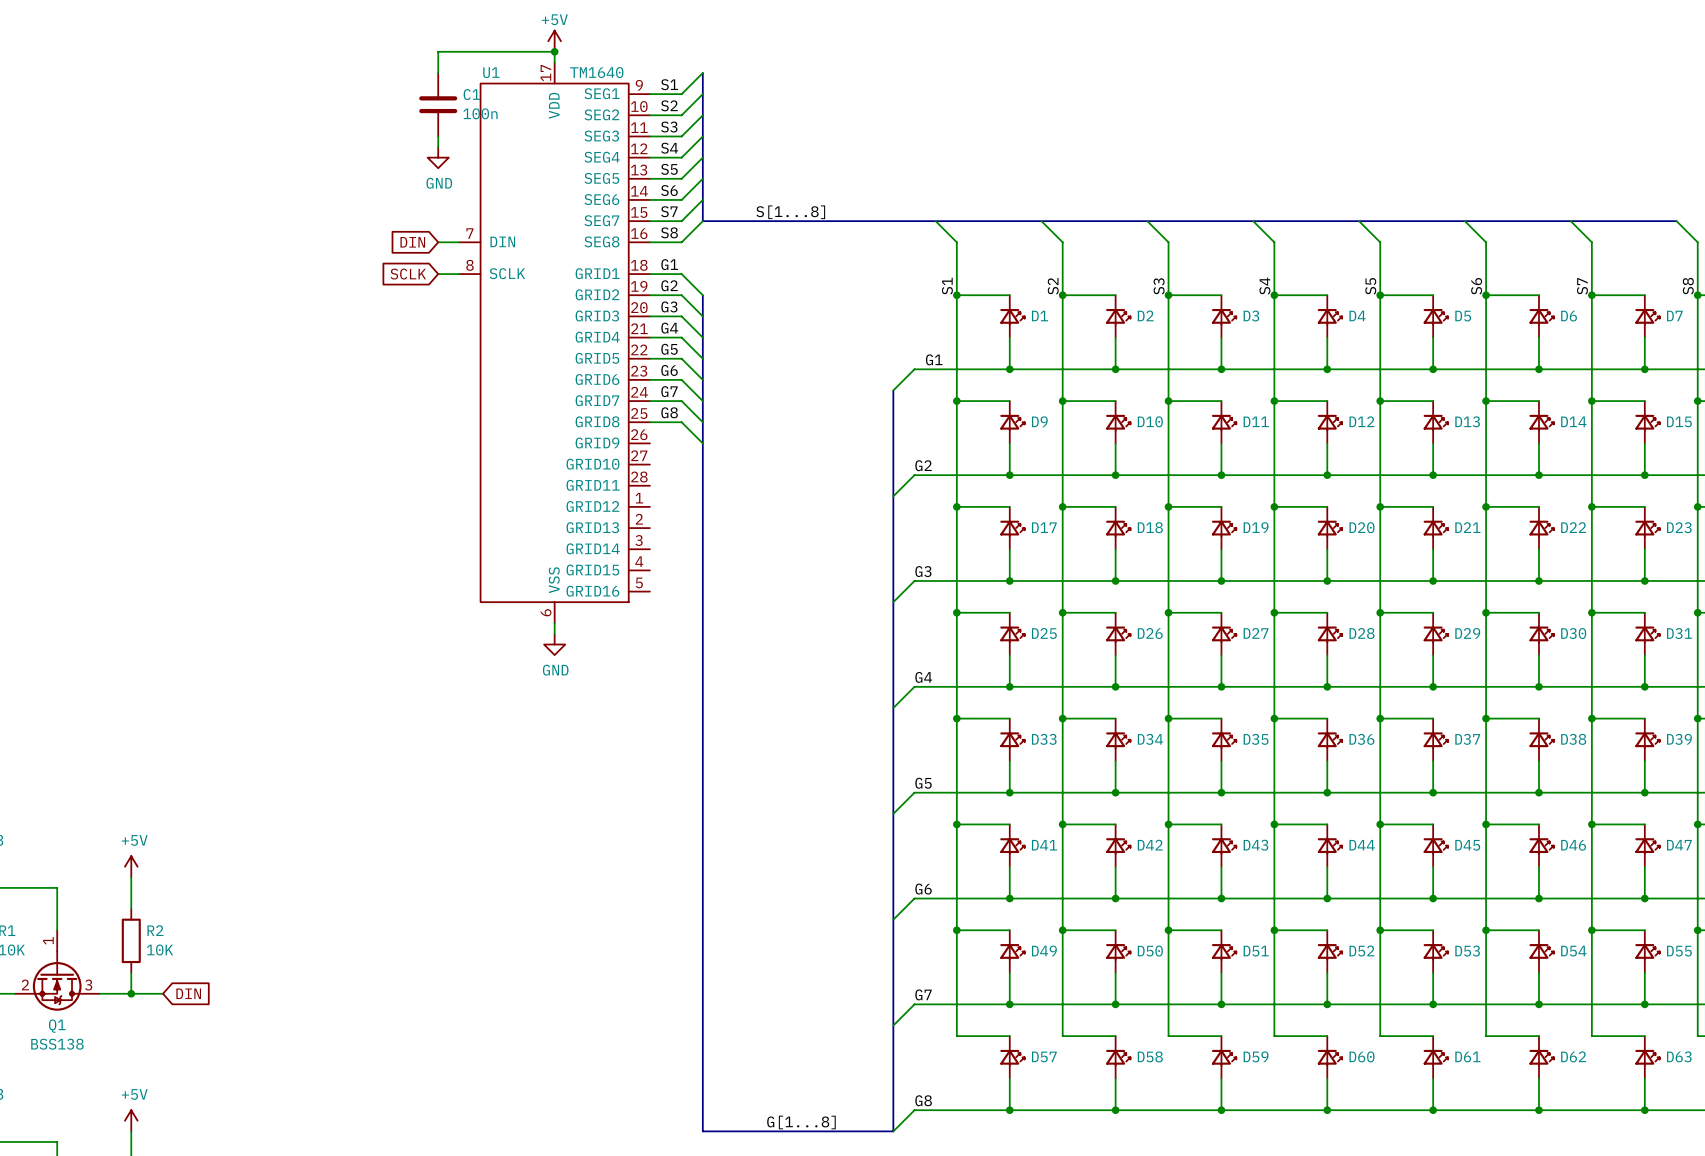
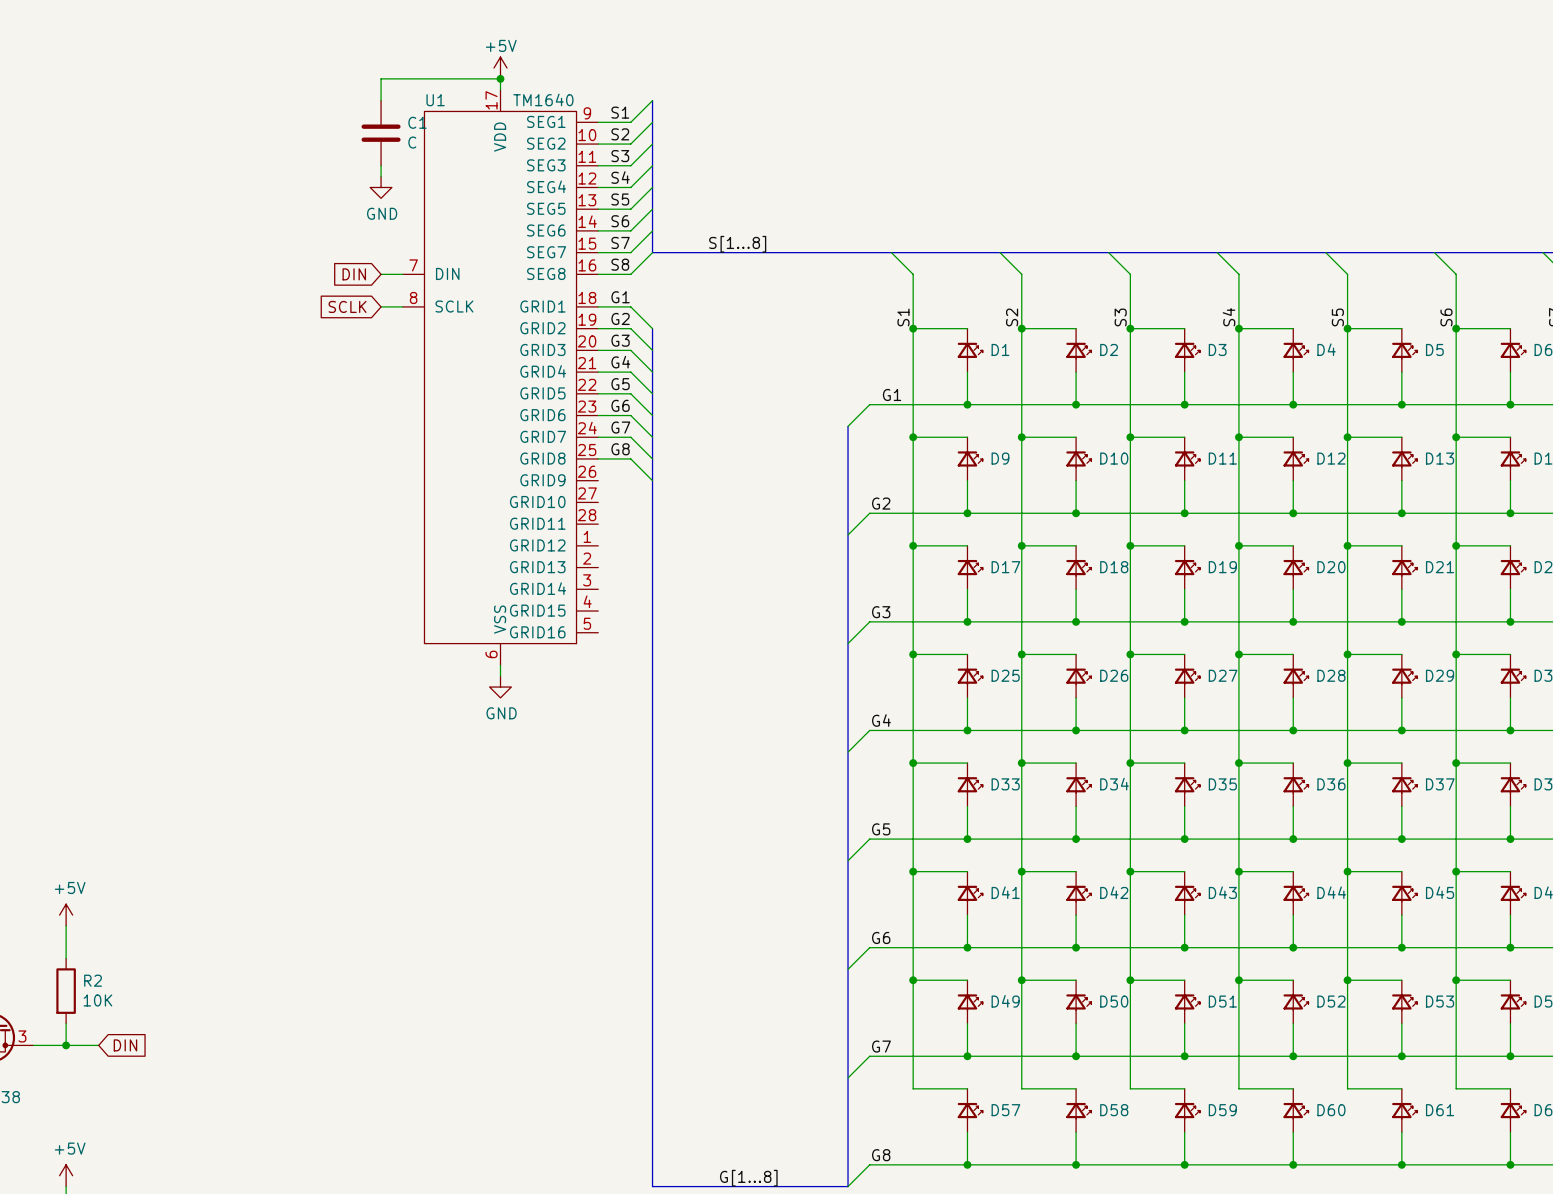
C1 value: 100n (480, 113) -> C (412, 142)

